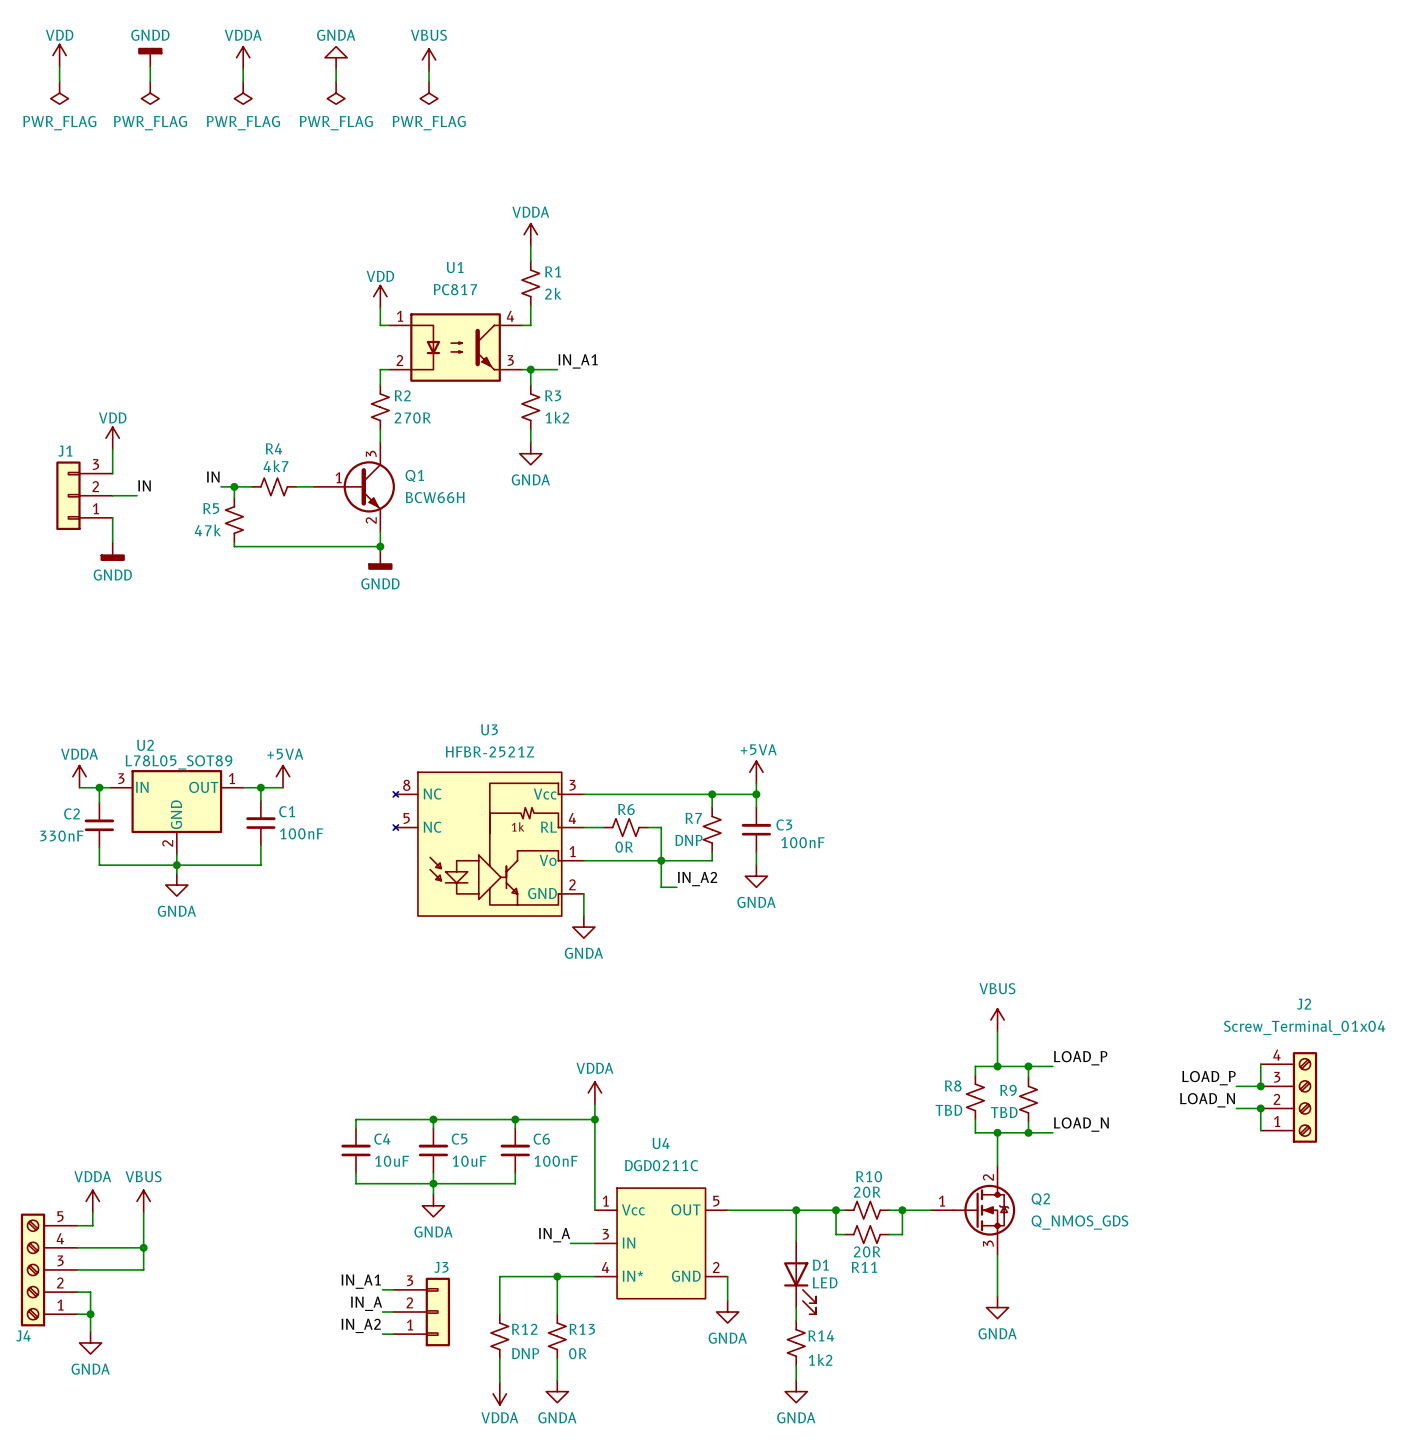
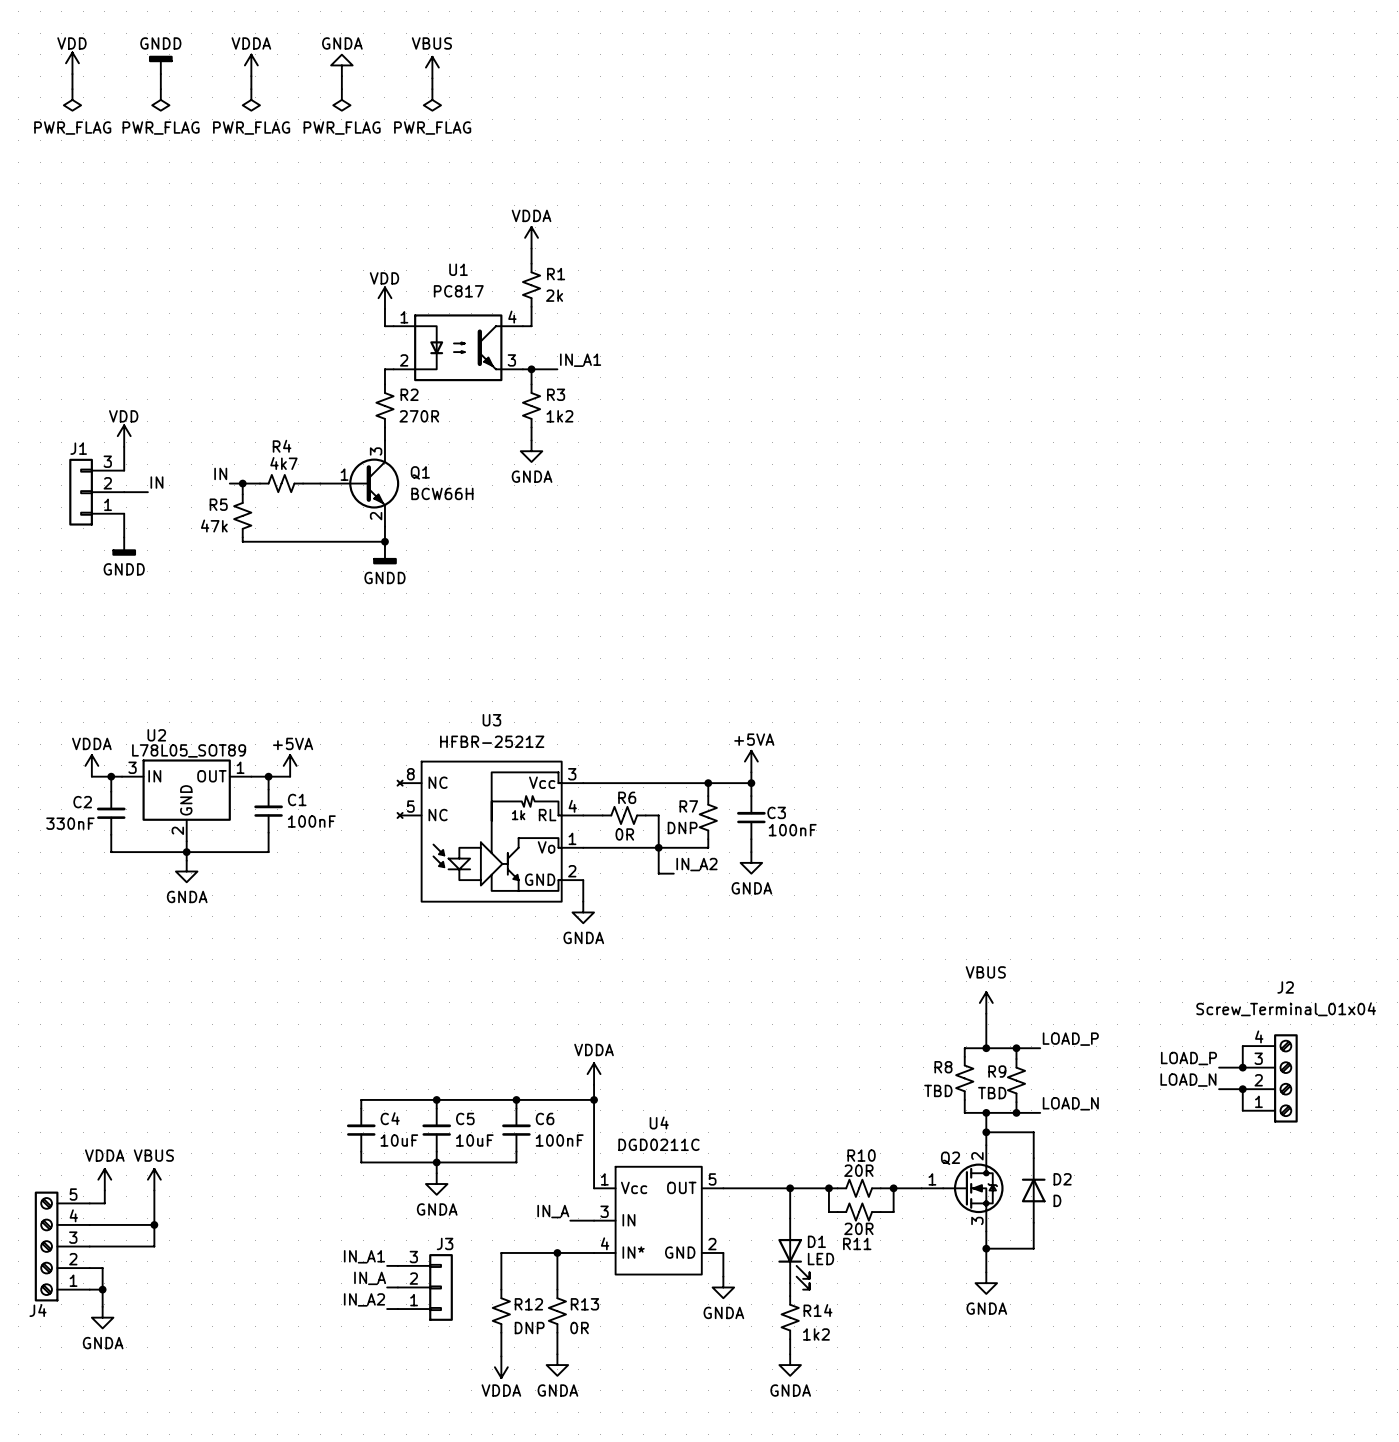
wire: none -> (986, 1132) (1033, 1132) (1033, 1158)
junction: none -> (986, 1132)
Q2 name position: Q2 (1040, 1199) -> Q2 (950, 1158)
D2: none -> D (1033, 1190)
Q2 value: Q_NMOS_GDS (1079, 1222) -> none
wire: none -> (1033, 1222) (1033, 1248) (986, 1248)
junction: none -> (986, 1248)

